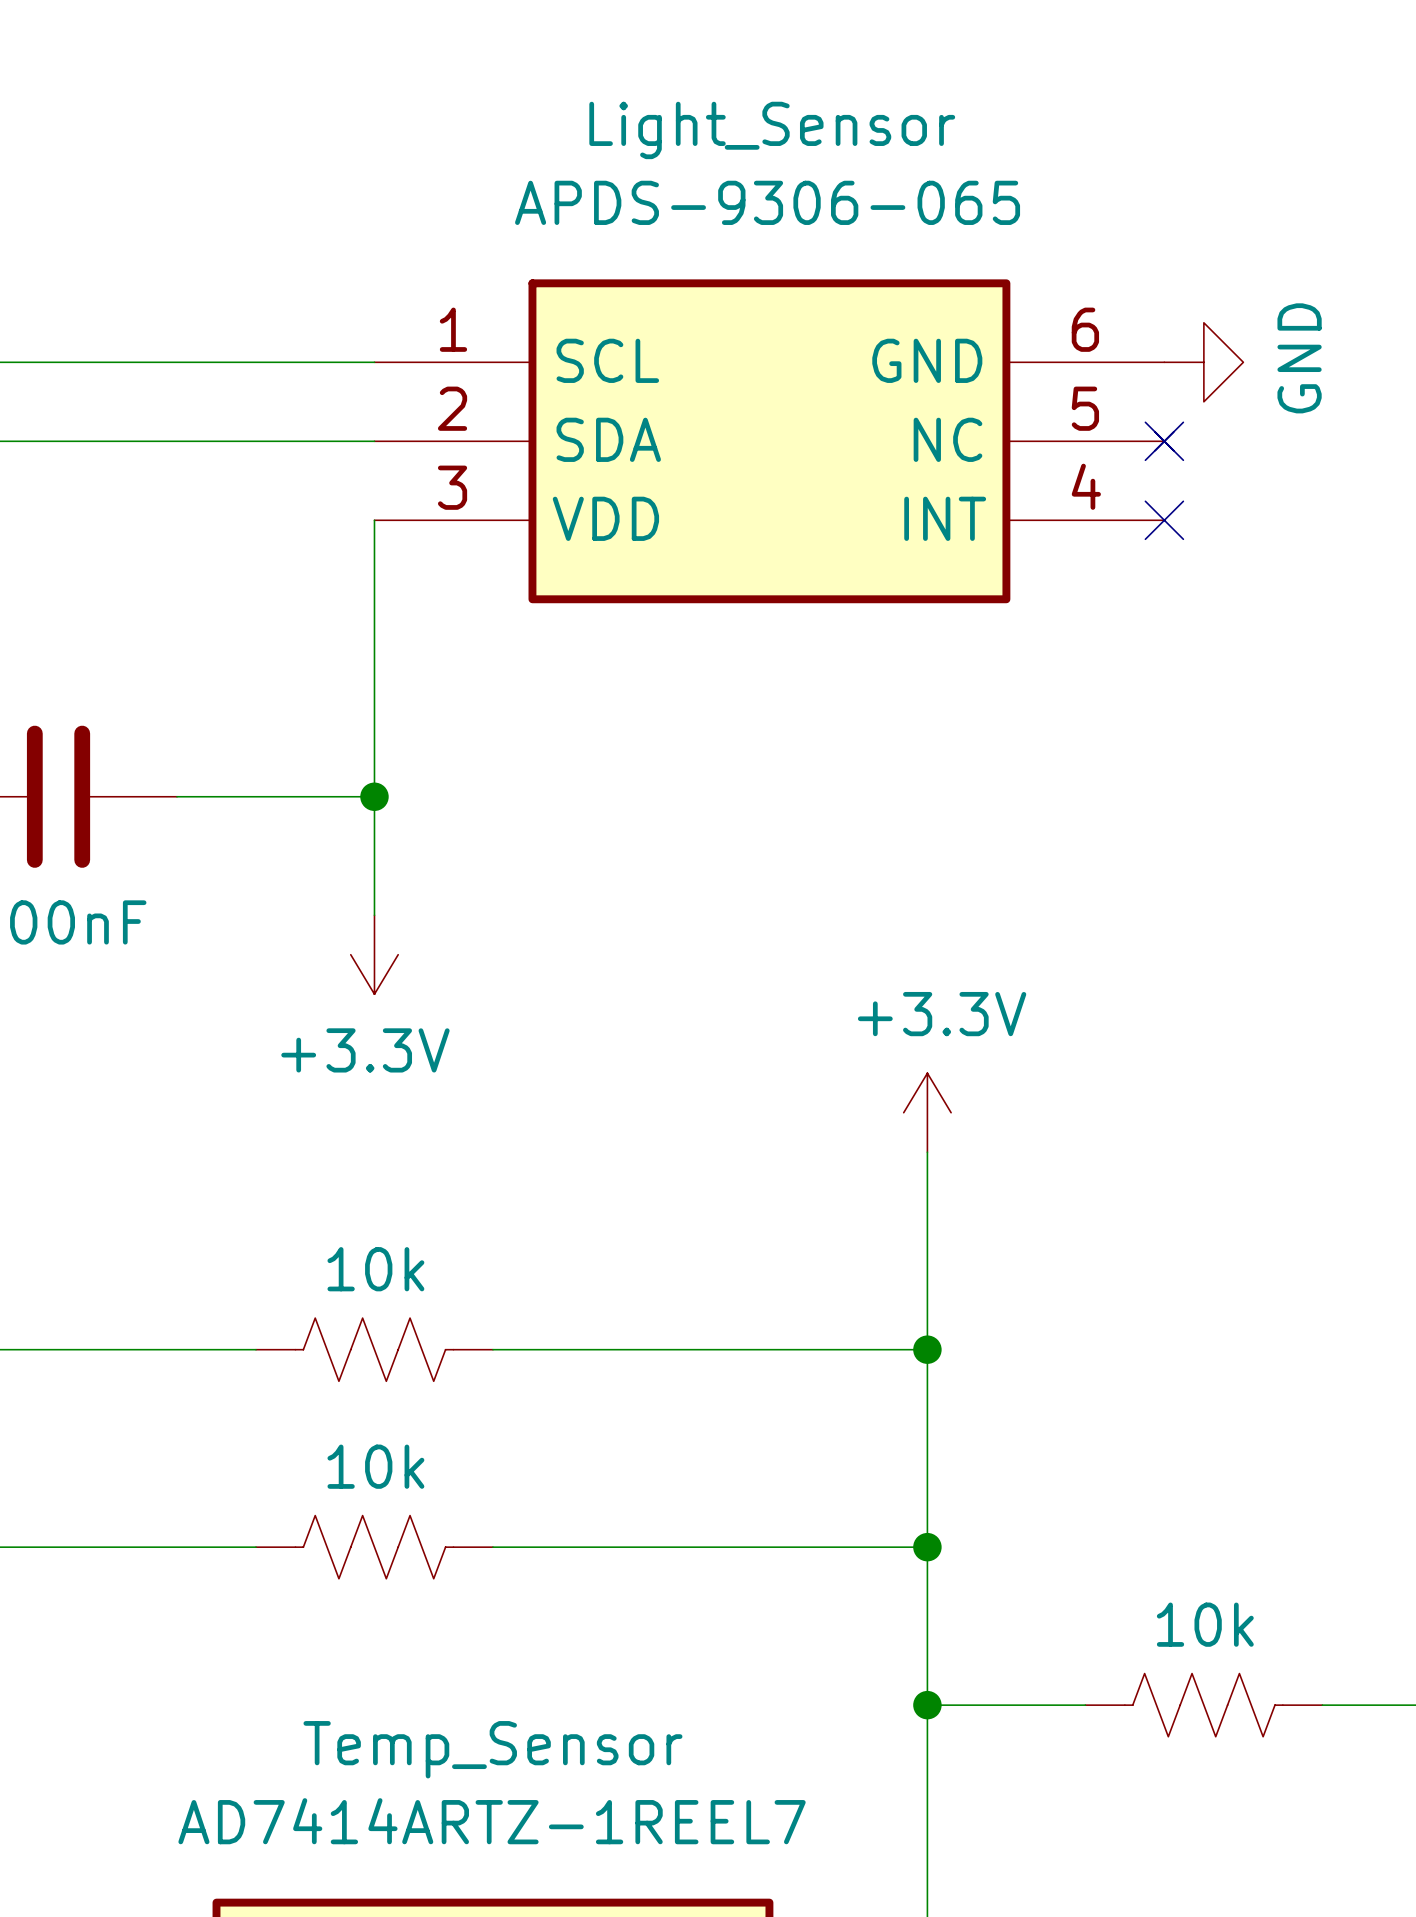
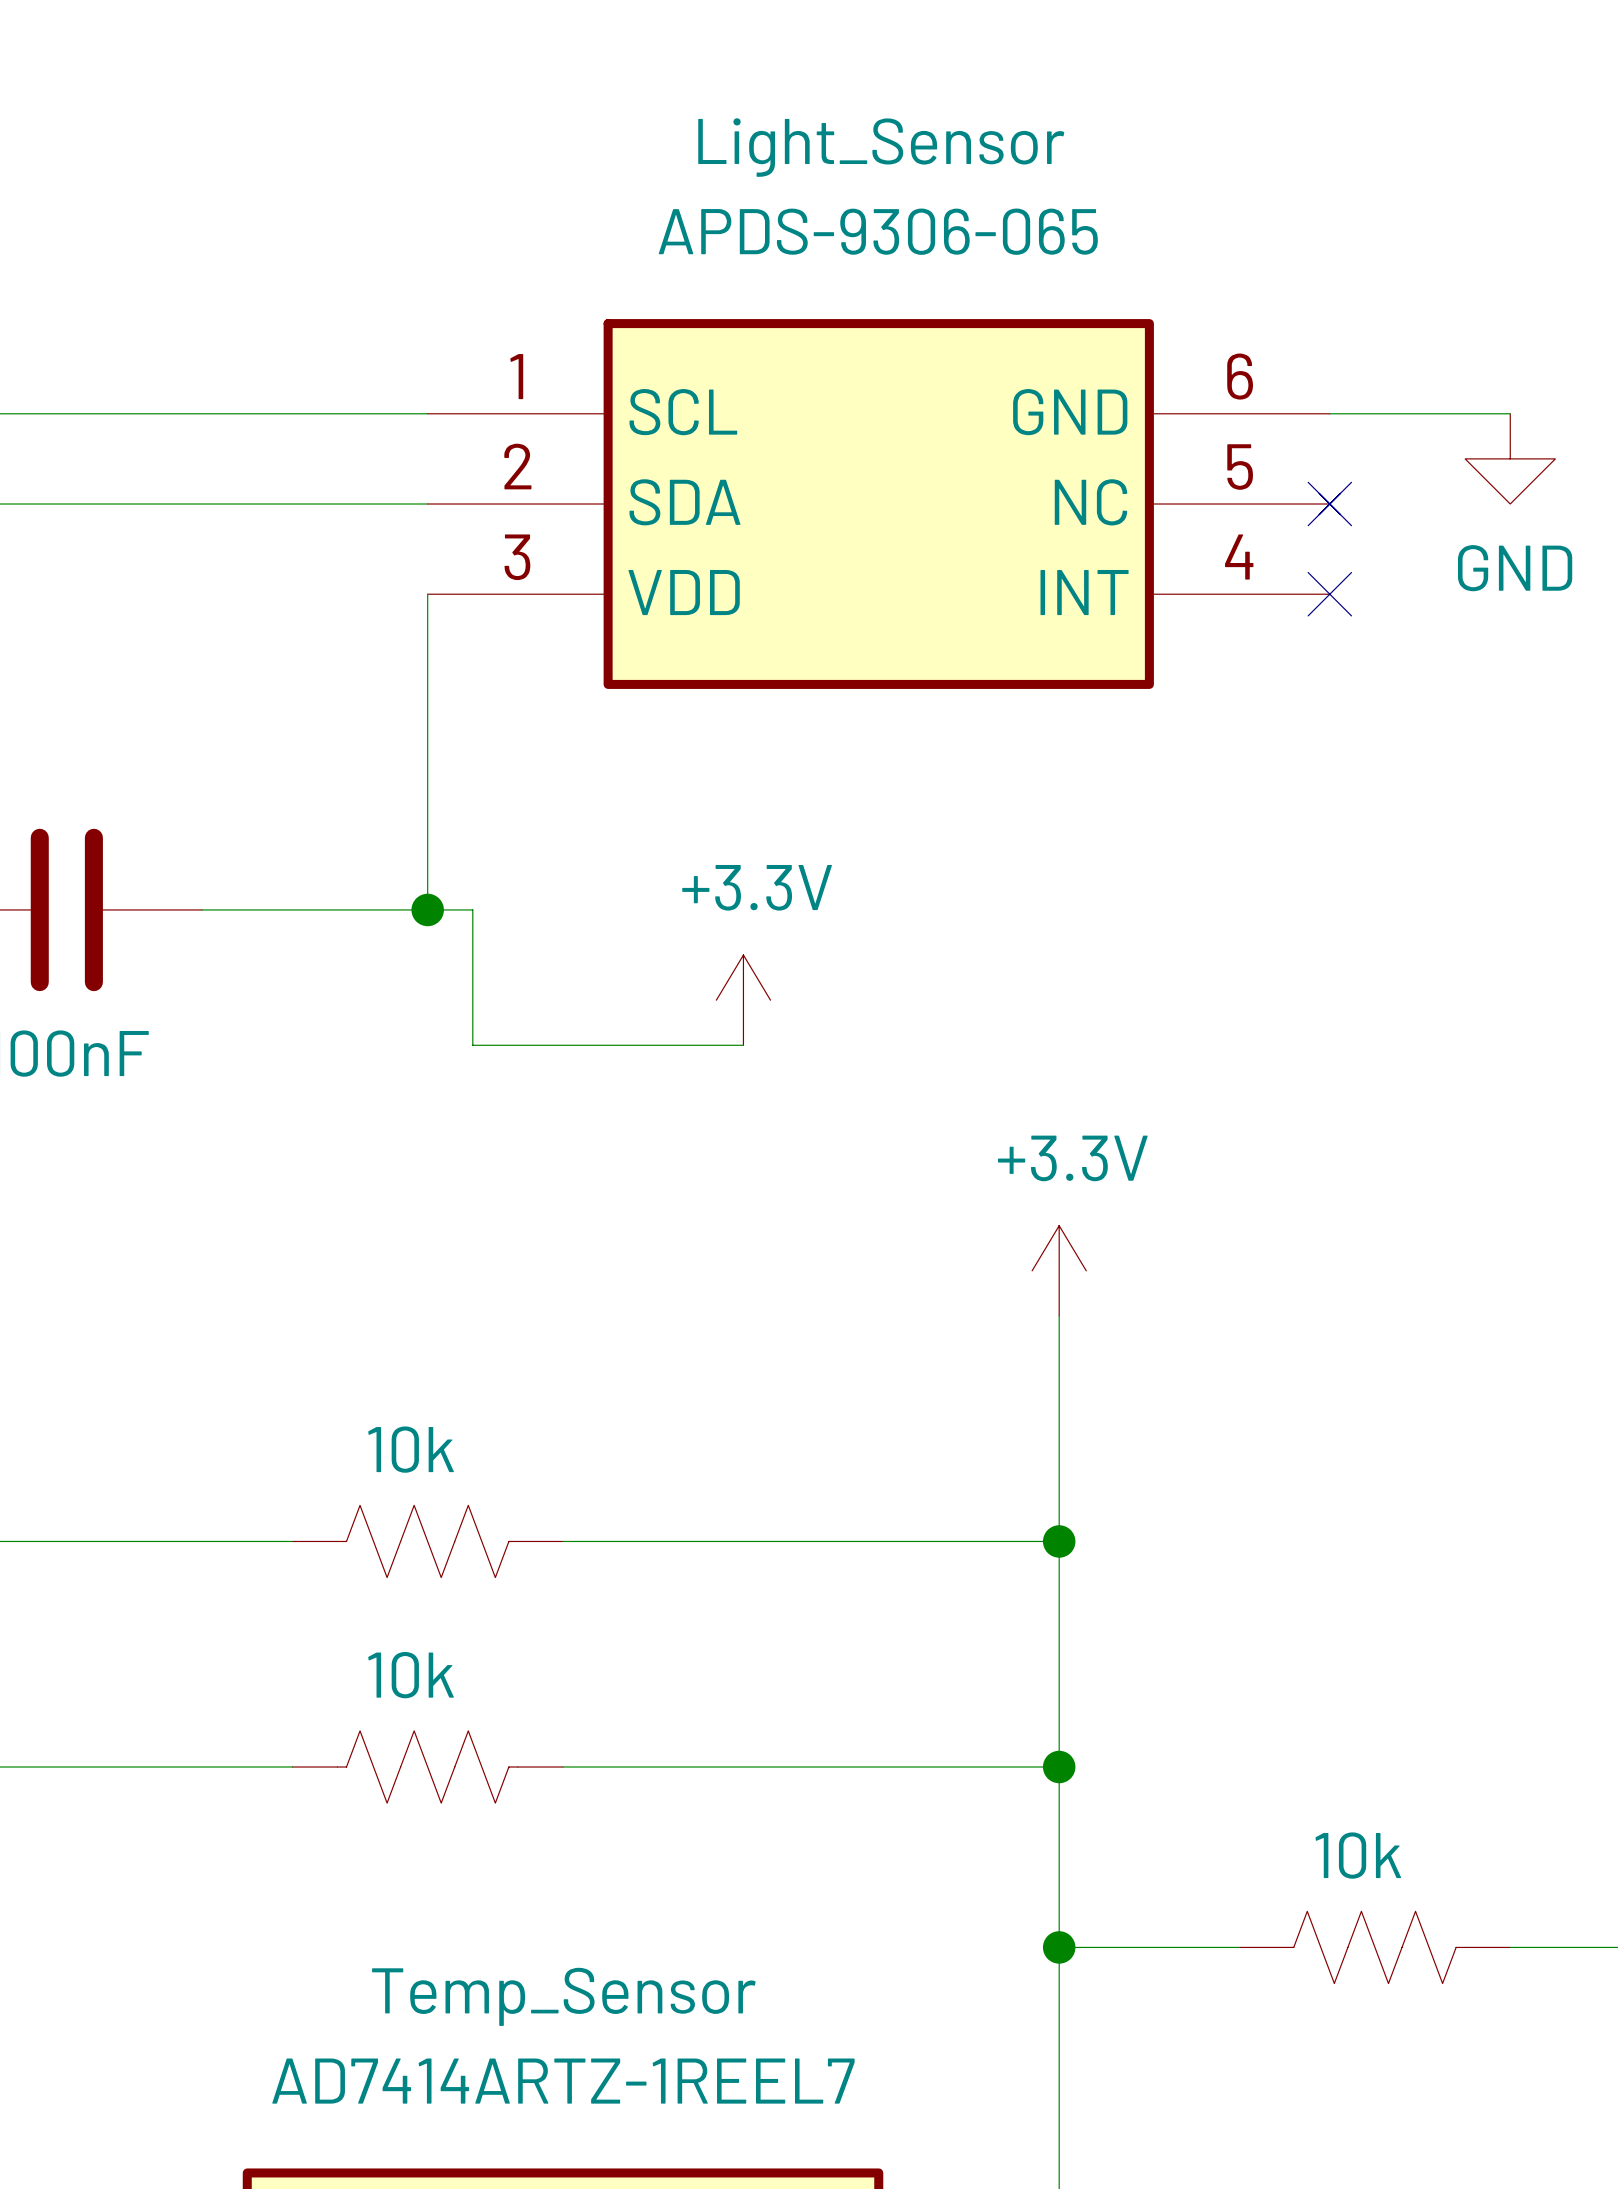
wire: none -> (1329, 413) (1510, 413)
power symbol rotation: 0° (1203, 362) -> 90° clockwise (1510, 458)
power symbol position: GND (1203, 362) -> GND (1510, 458)
wire: (374, 796) (374, 915) -> (427, 909) (472, 909) (472, 1045) (743, 1045)
power symbol rotation: 0° (374, 954) -> 180° (743, 1000)
power symbol position: +3.3V (374, 954) -> +3.3V (743, 1000)

